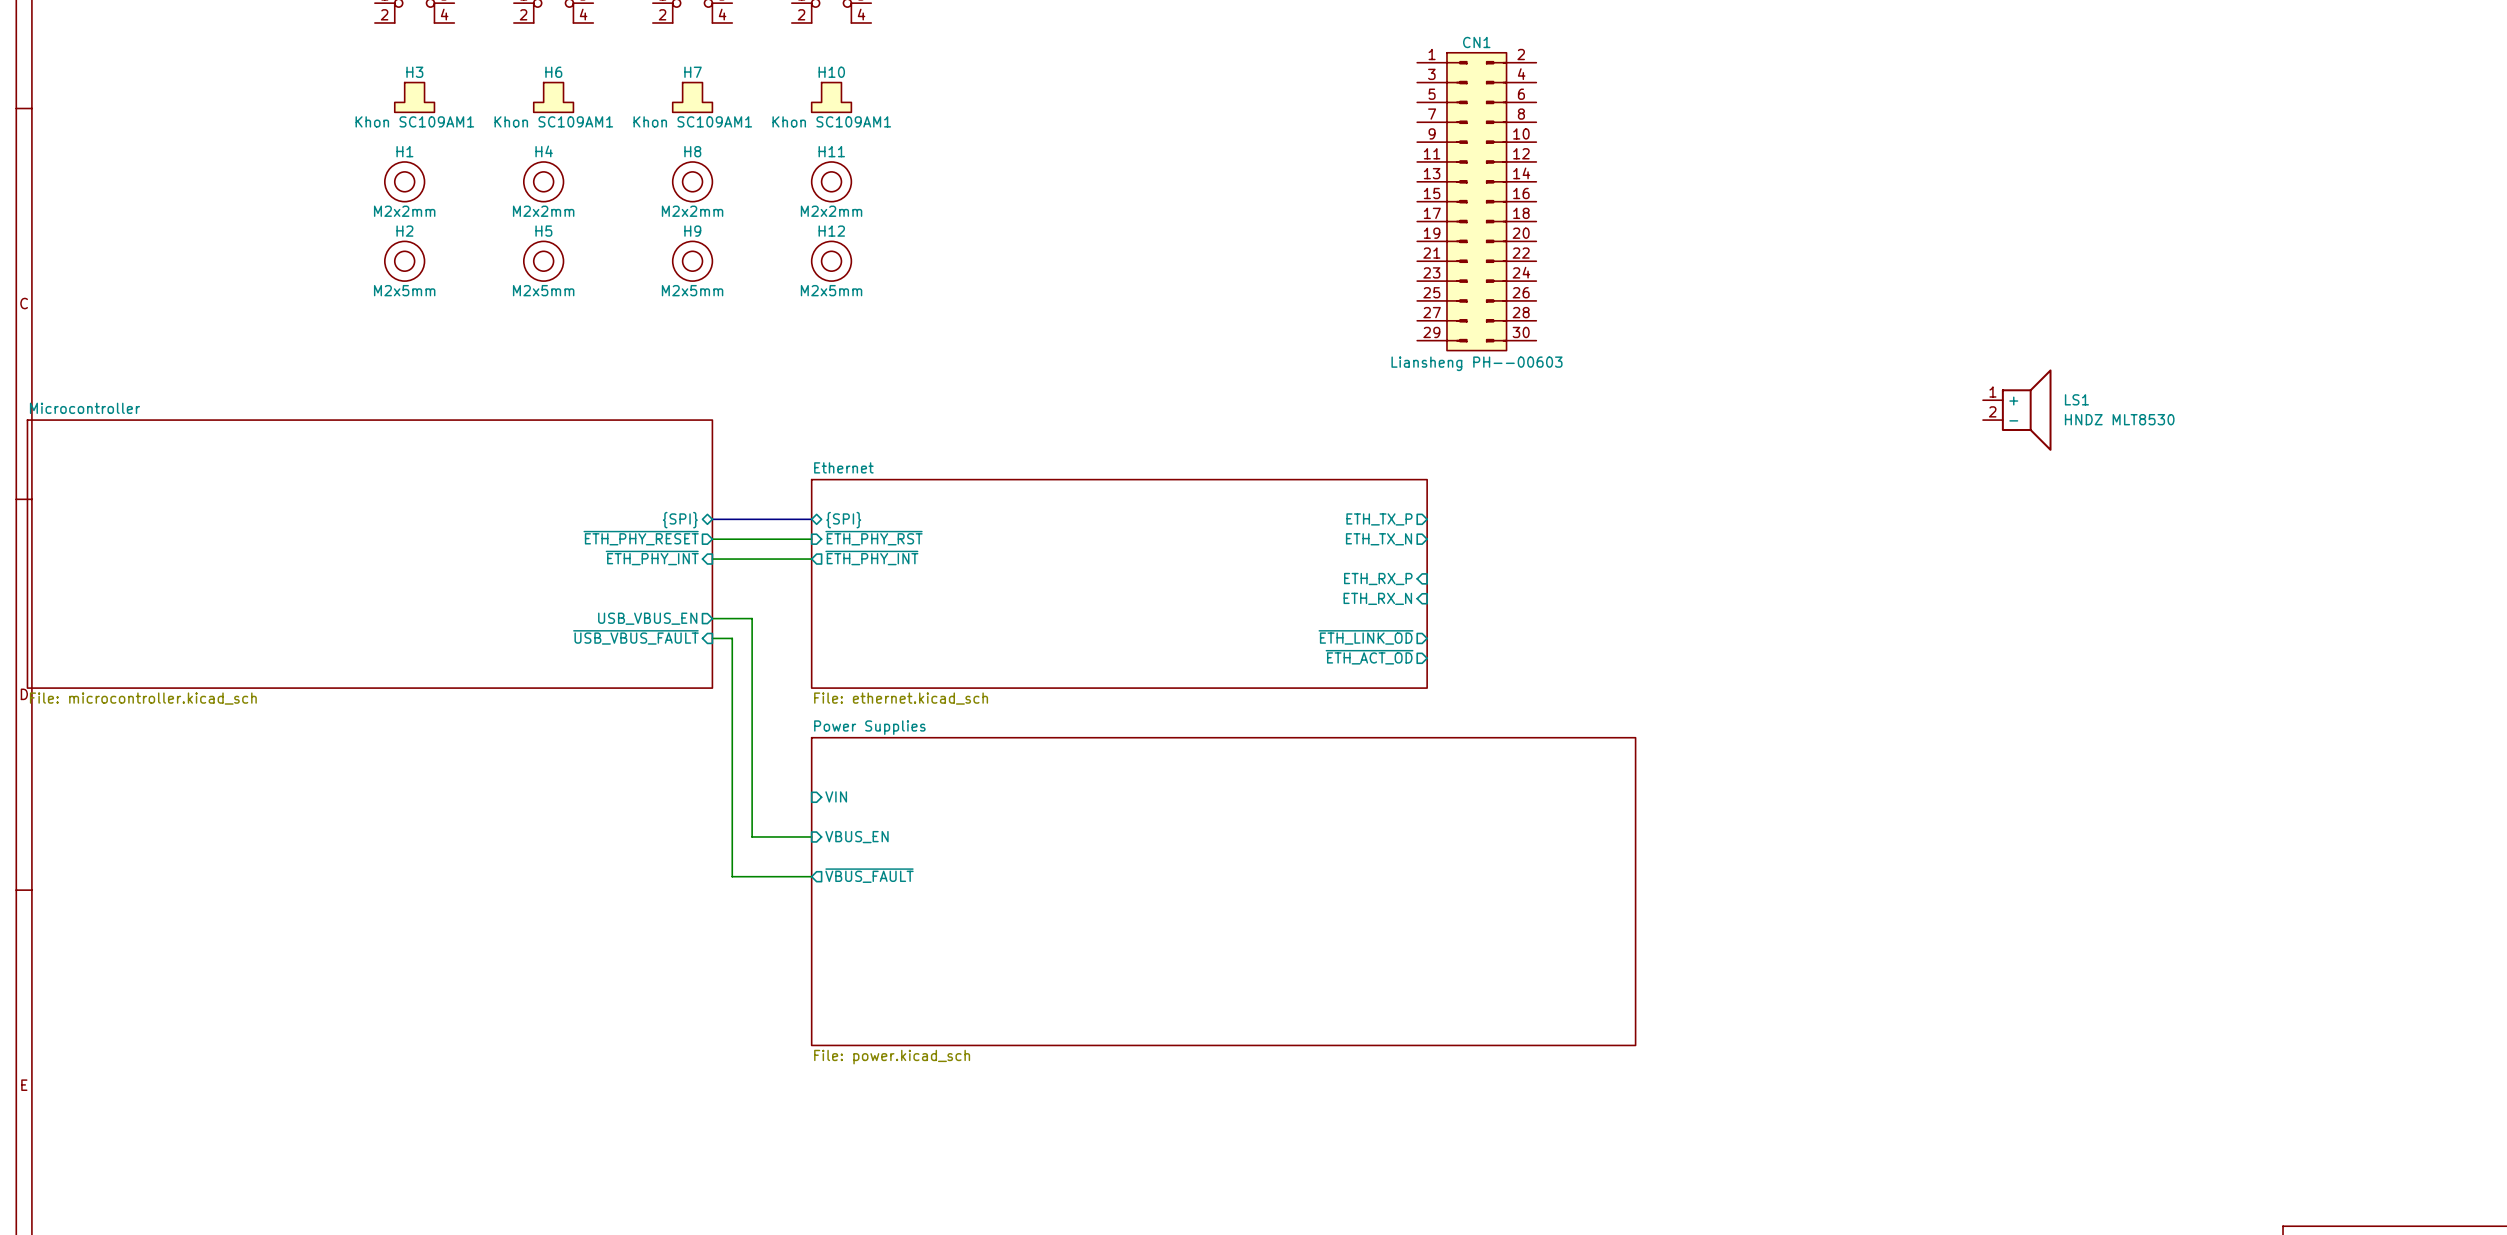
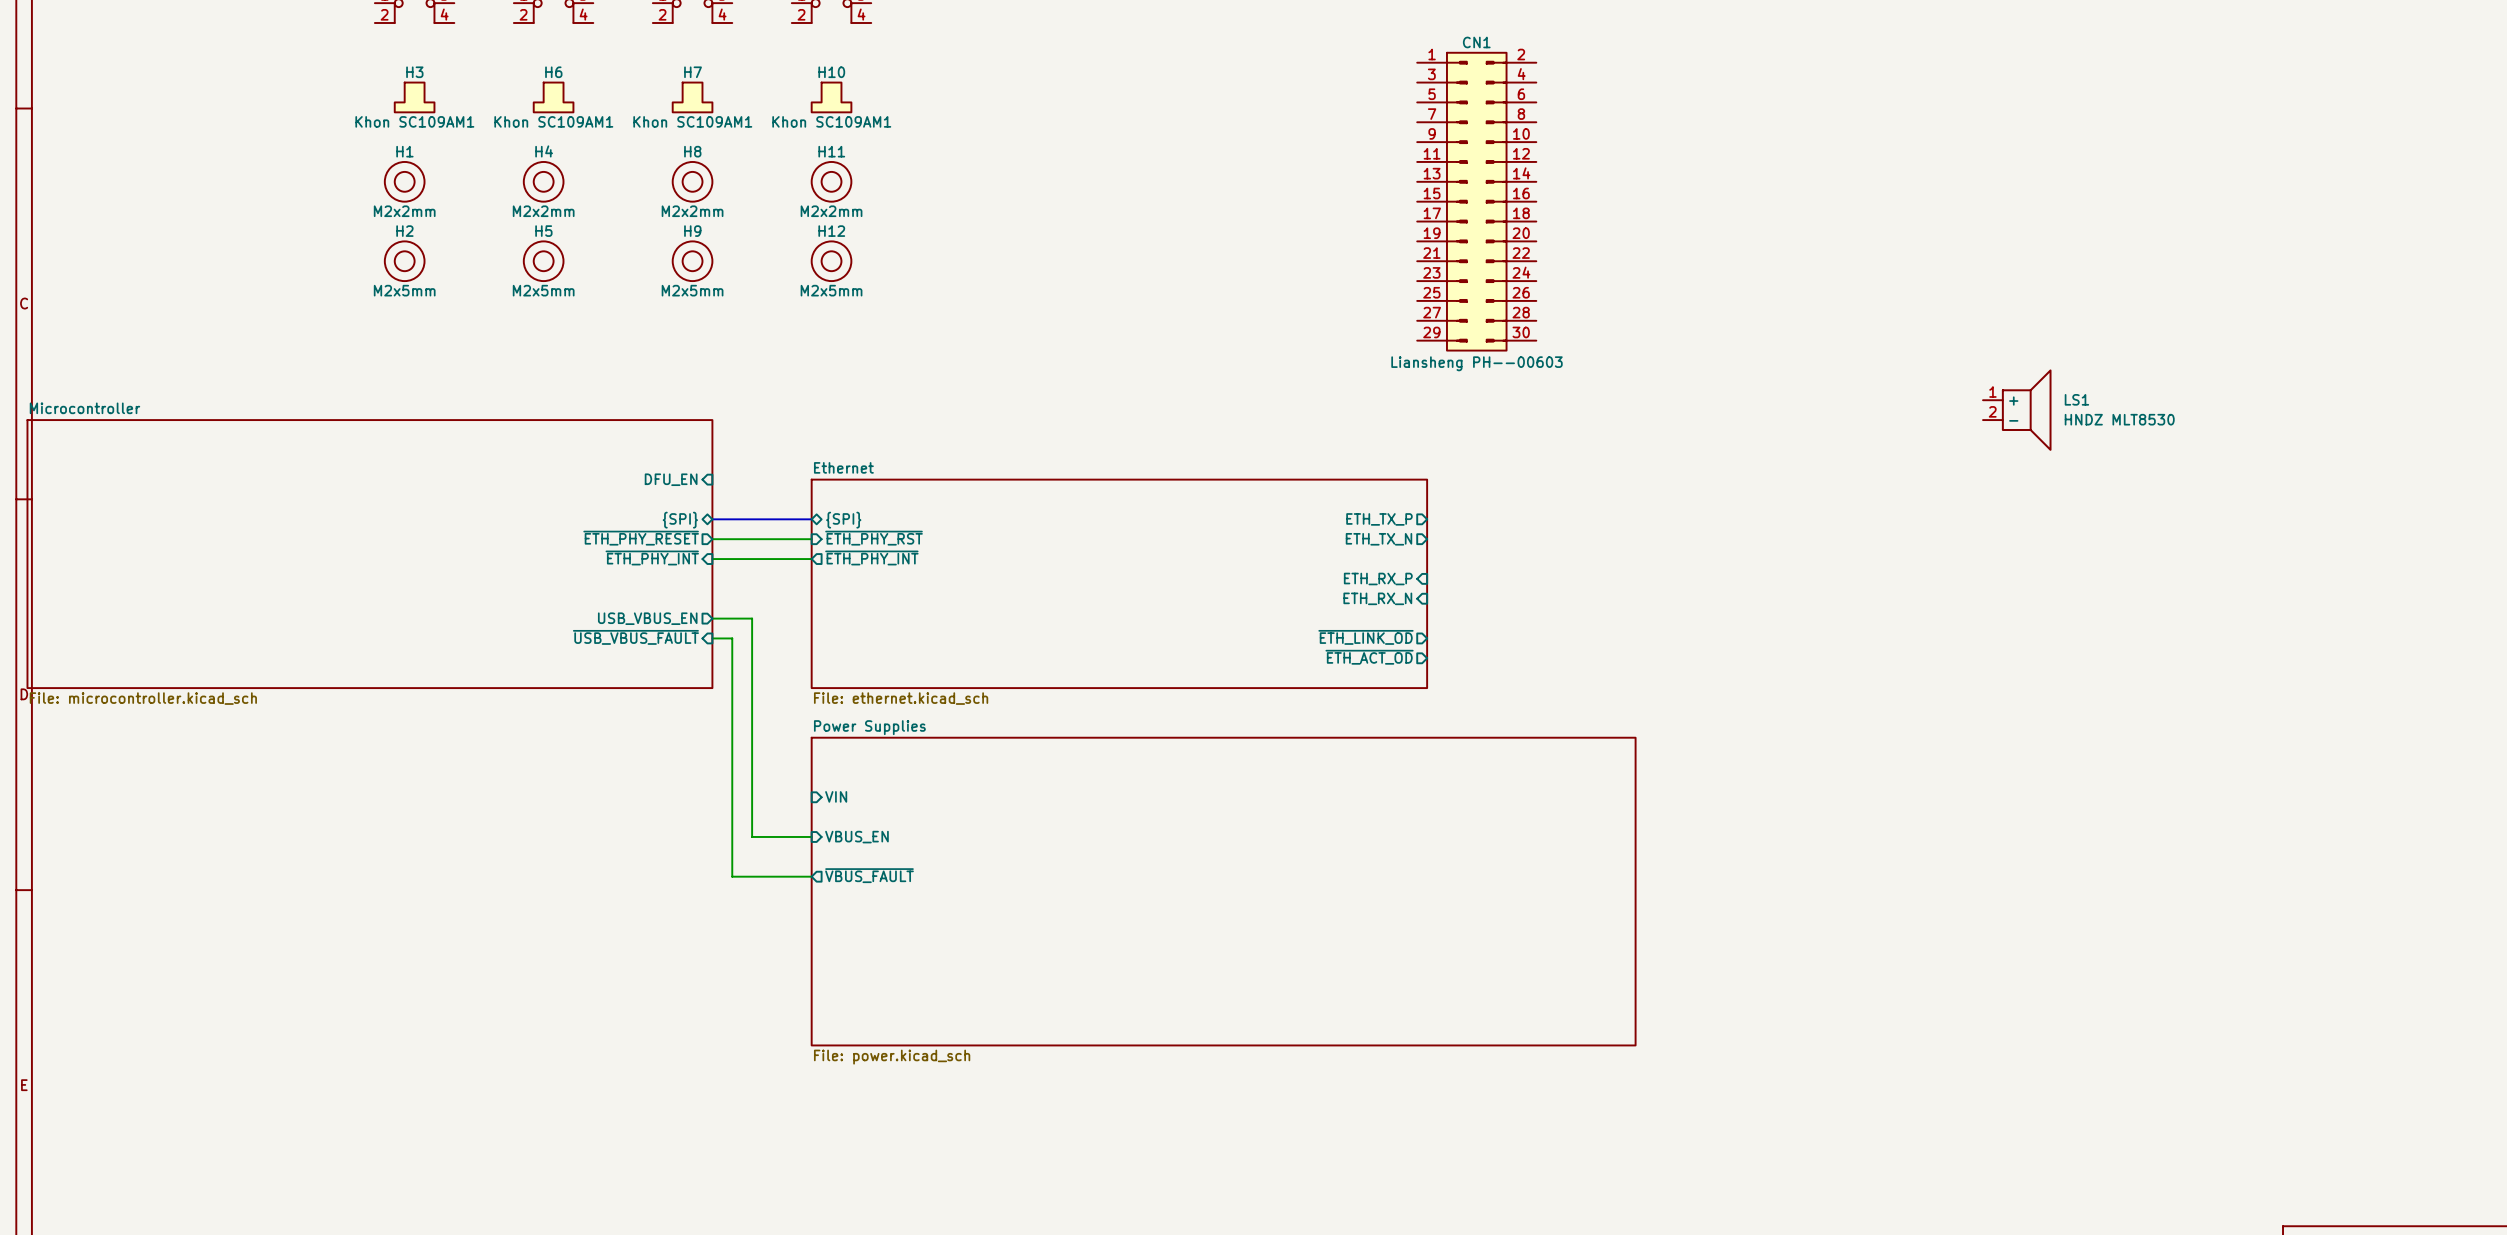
sheet pin: none -> DFU_EN (671, 479)

